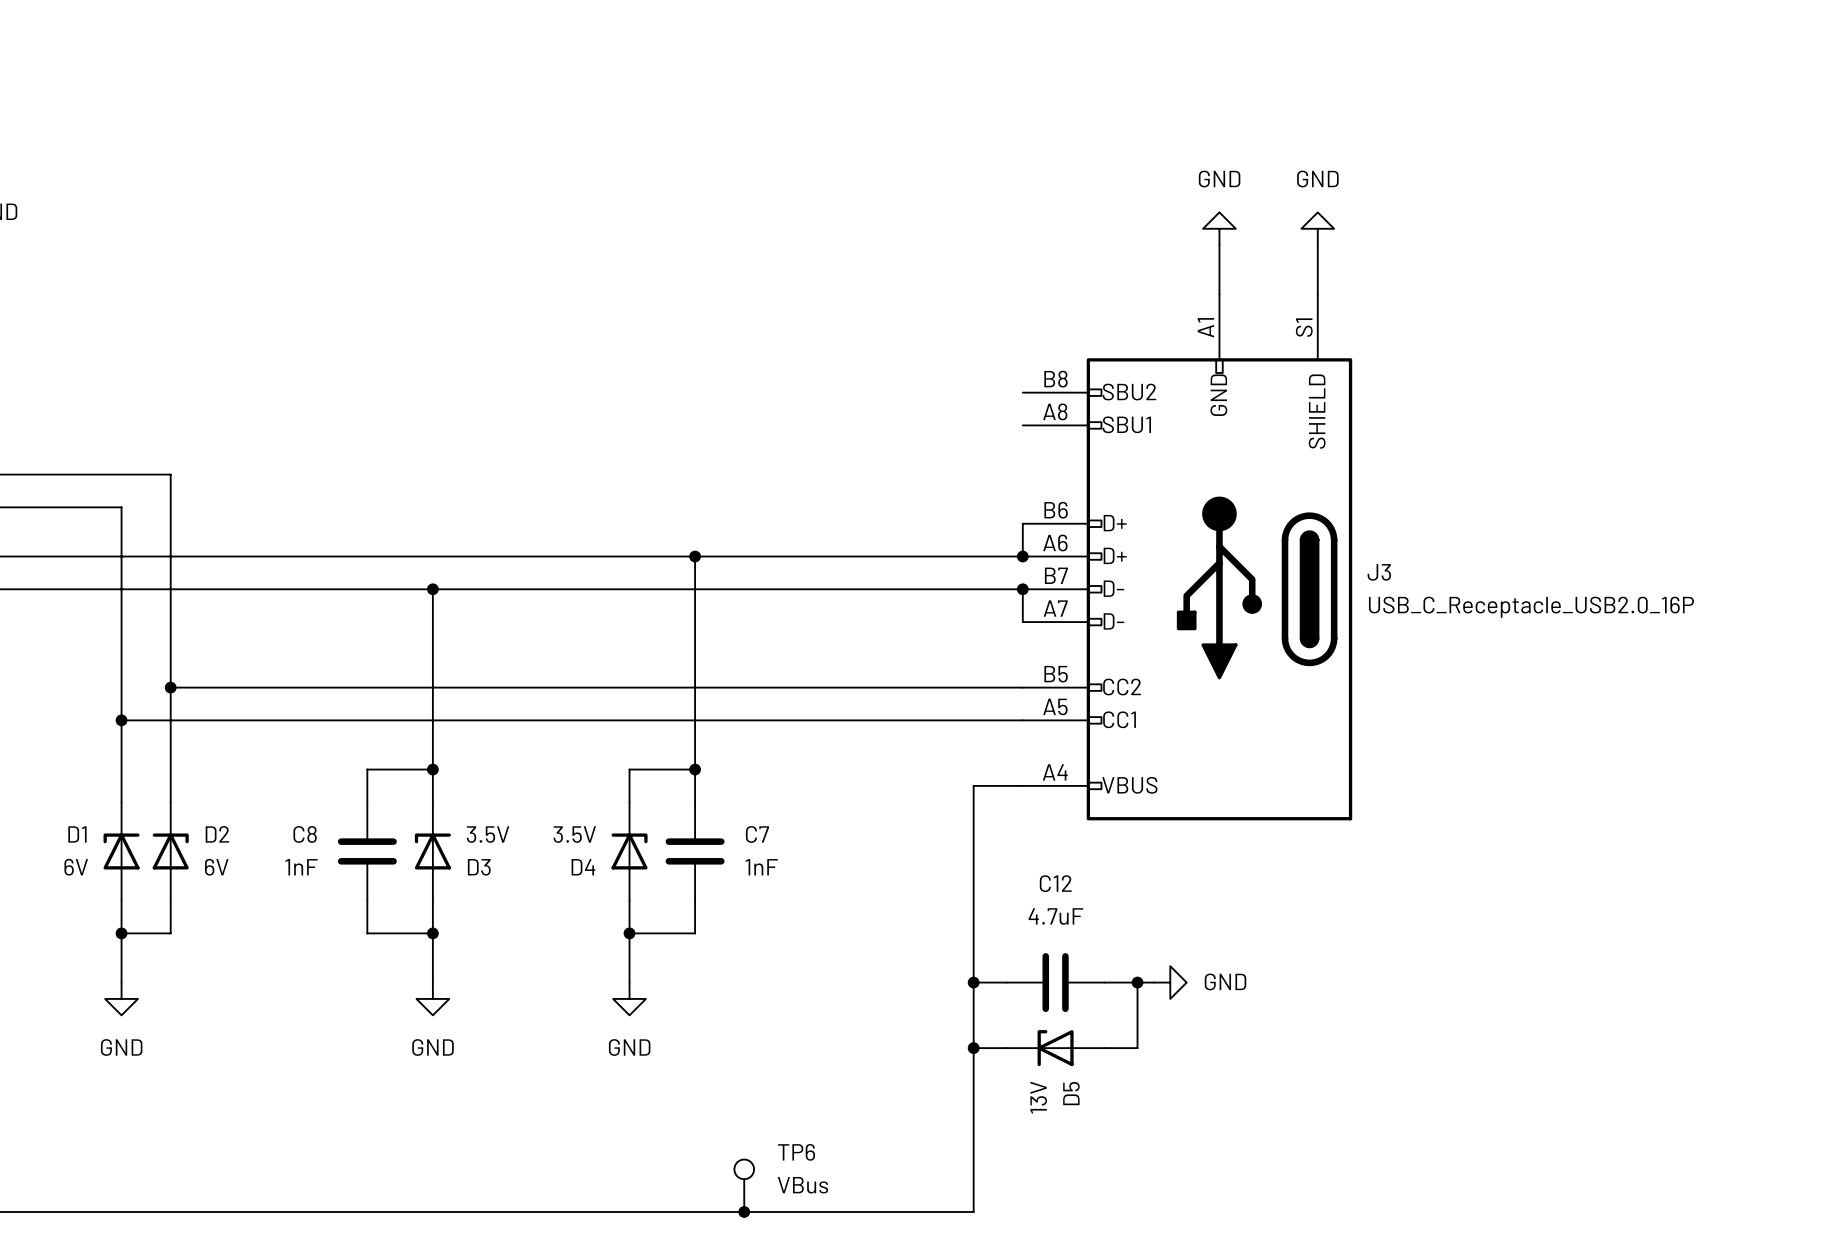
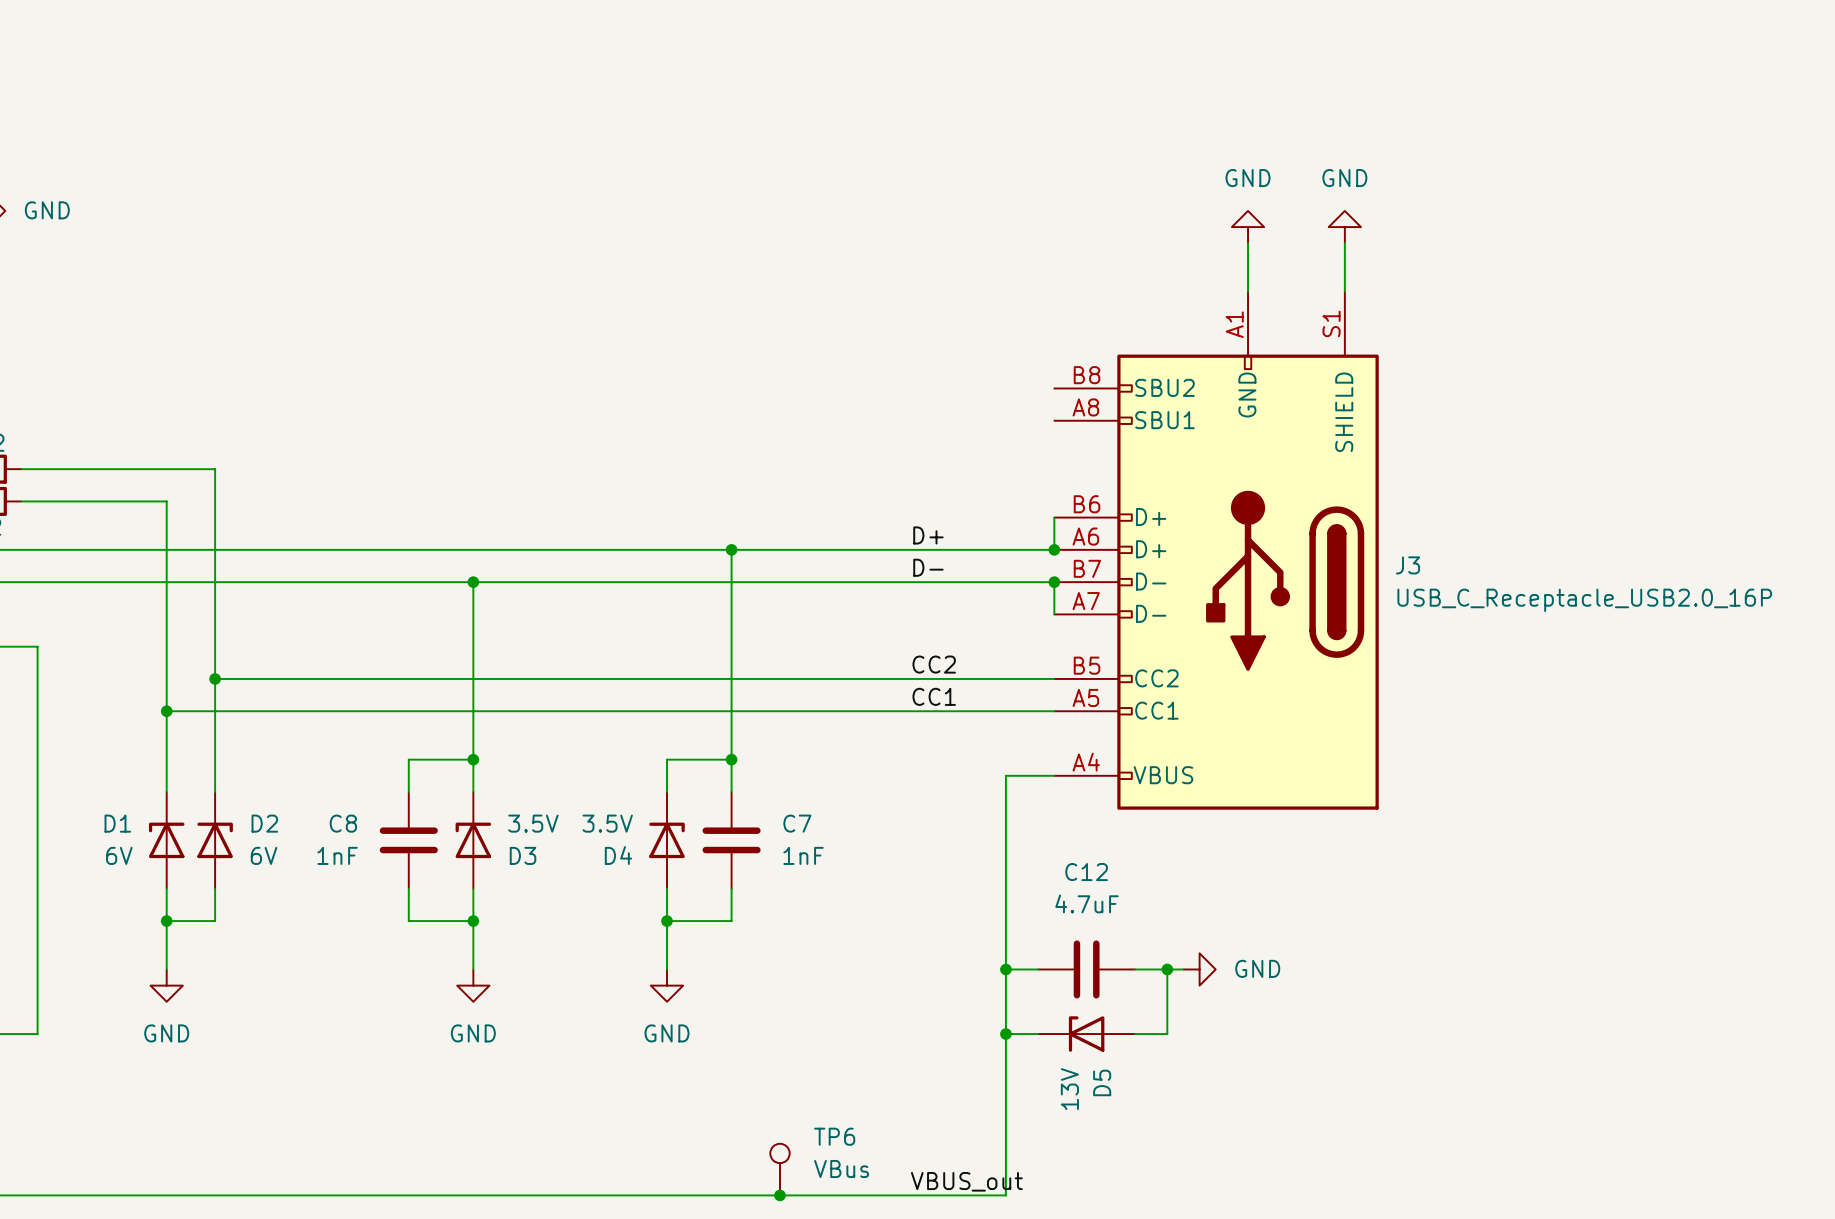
label: none -> D+ (928, 535)
label: none -> D- (928, 567)
label: none -> CC2 (934, 664)
label: none -> CC1 (934, 696)
label: none -> VBUS_out (966, 1181)

